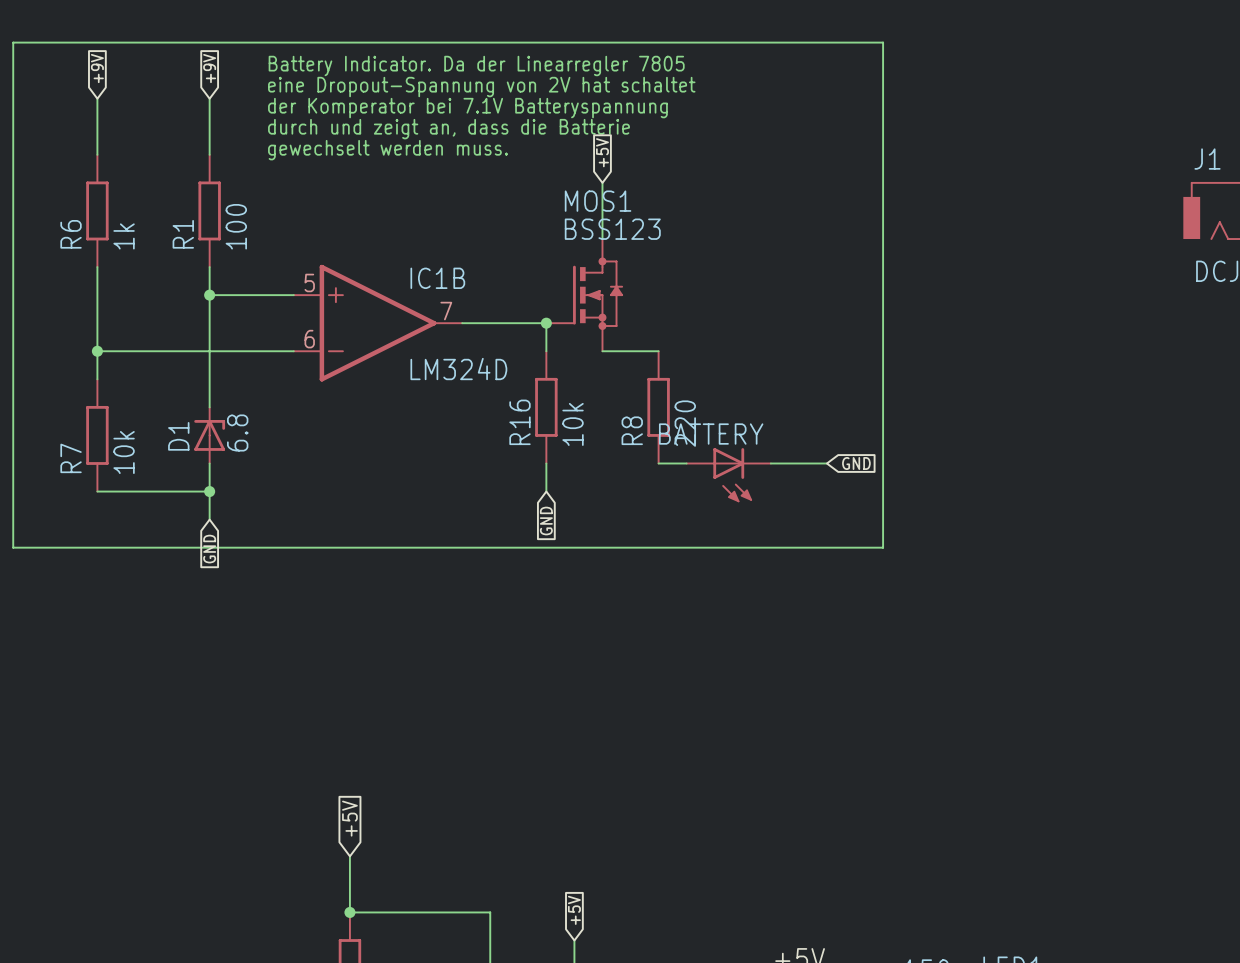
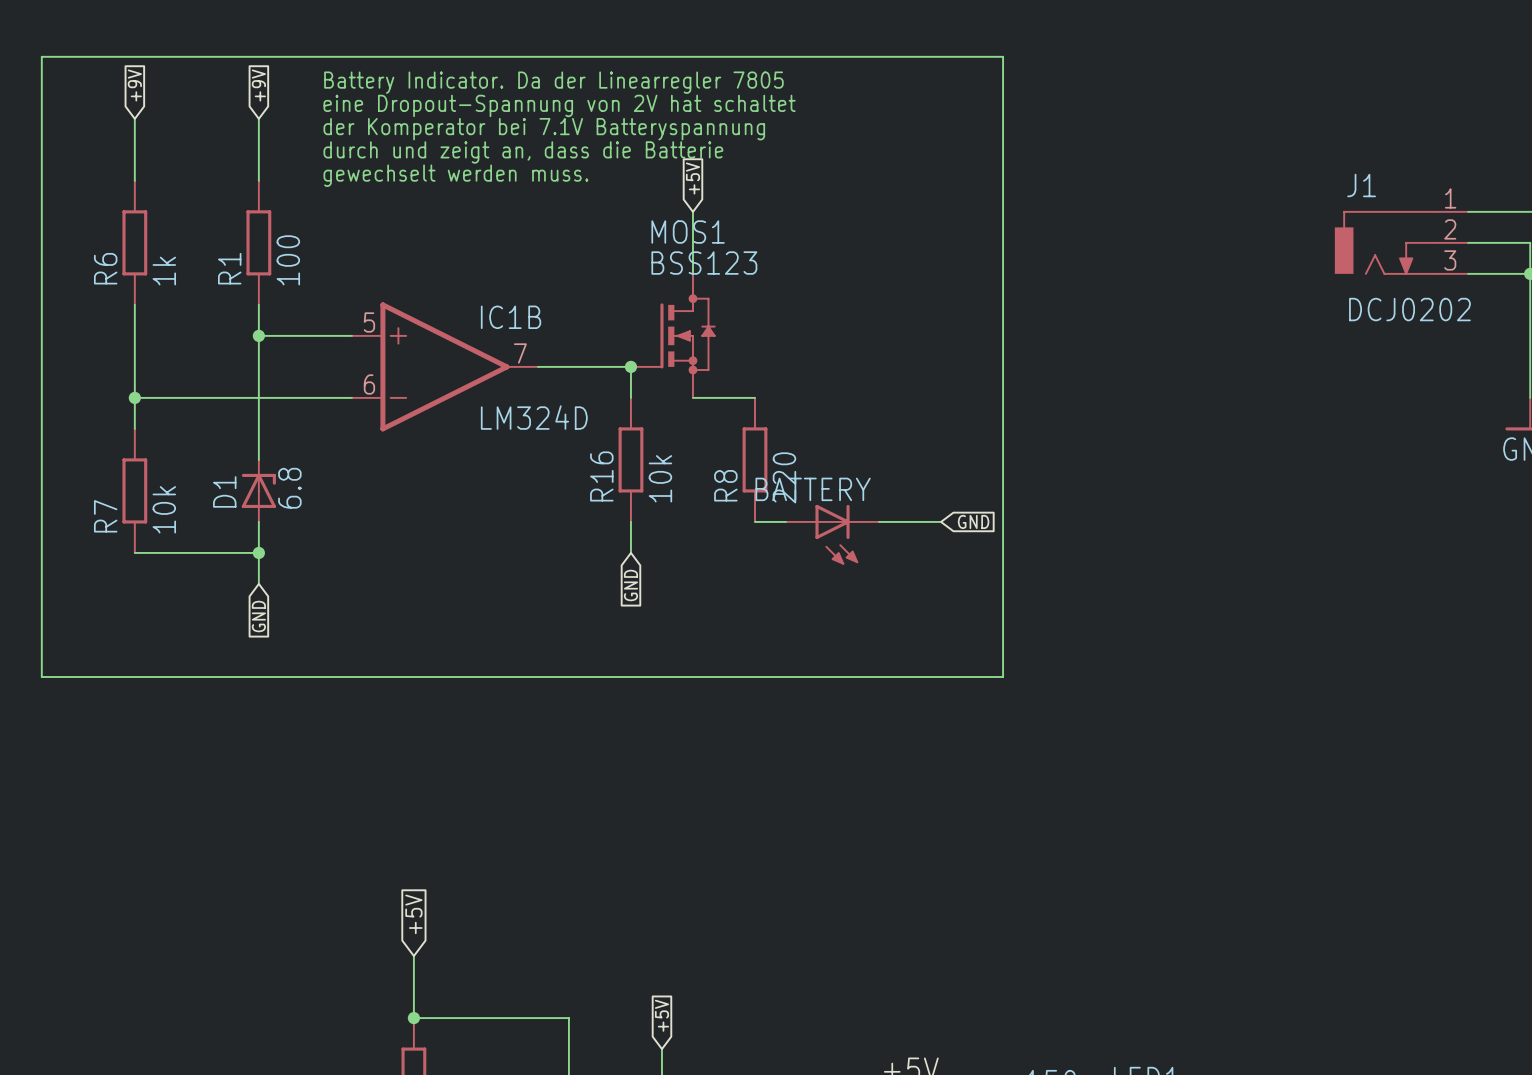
wire: (13, 547) (883, 547) -> (41, 614) (41, 676) (1003, 676) (1003, 614)

